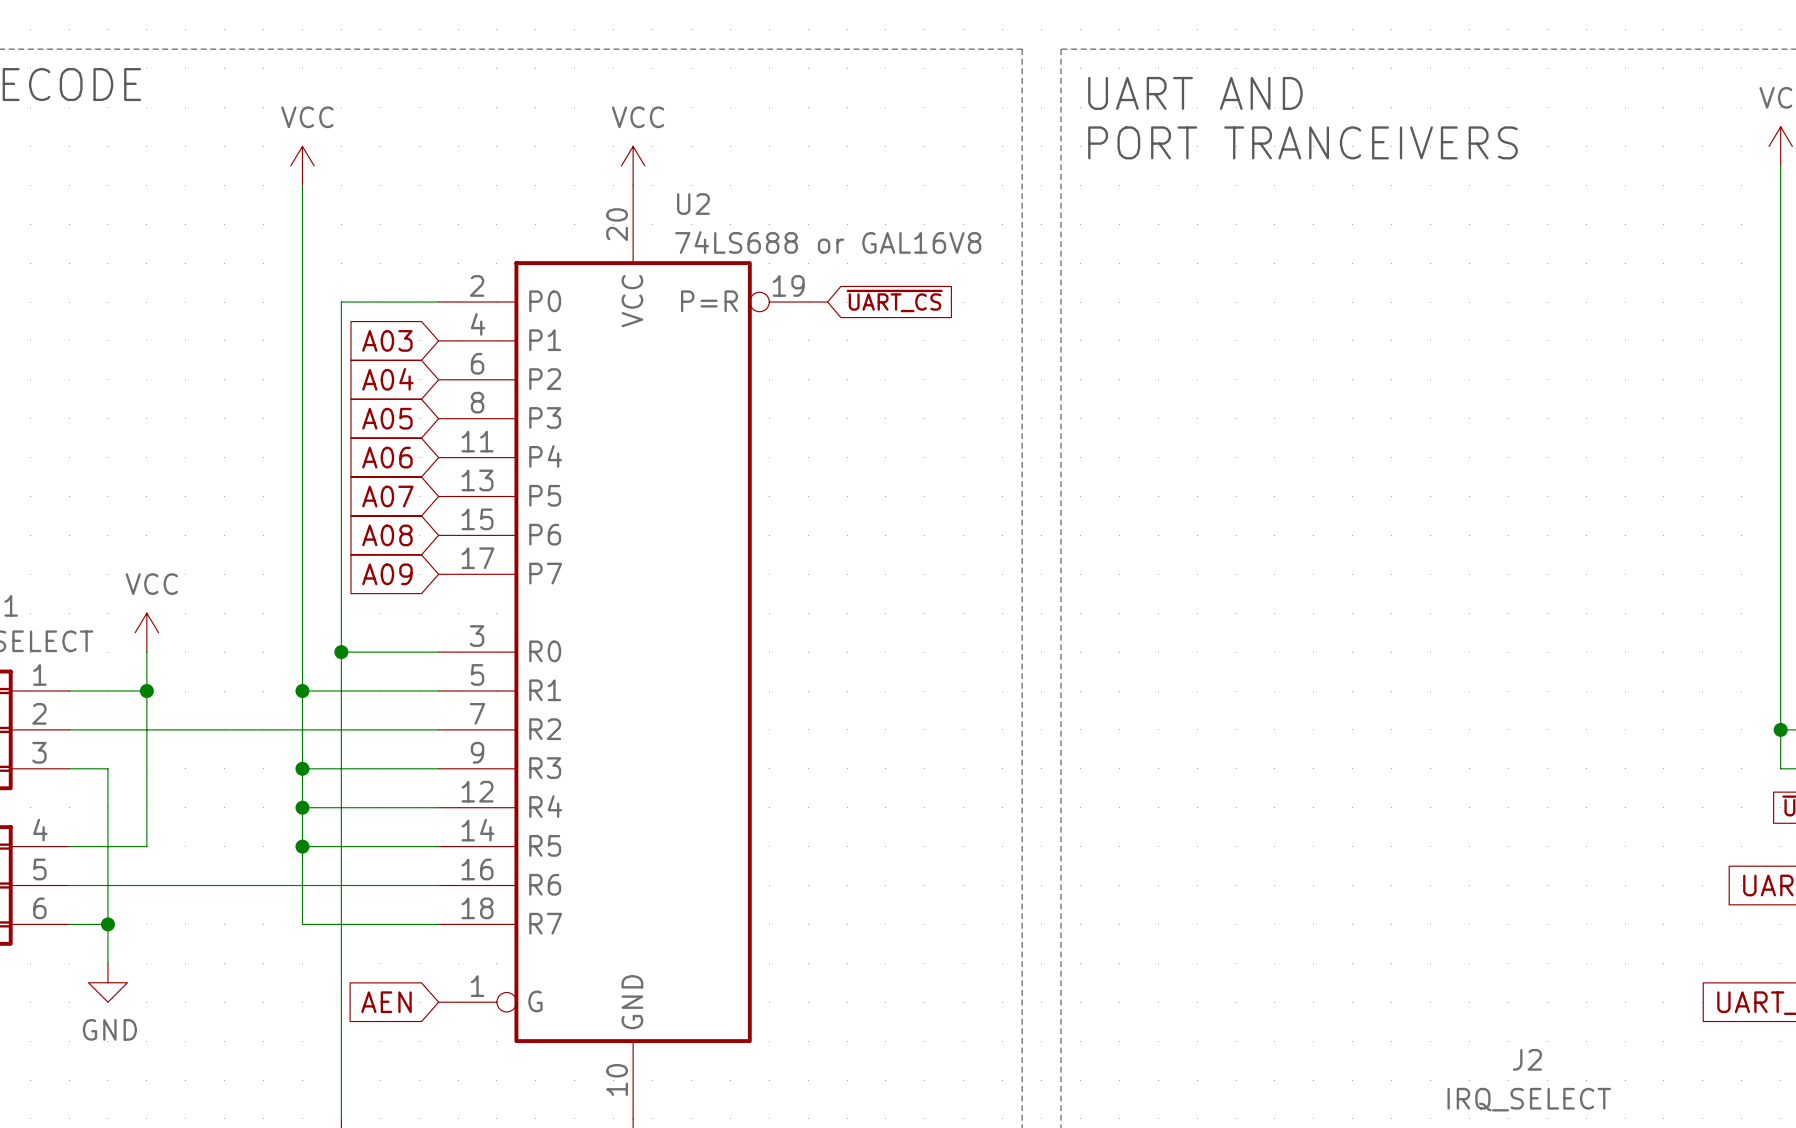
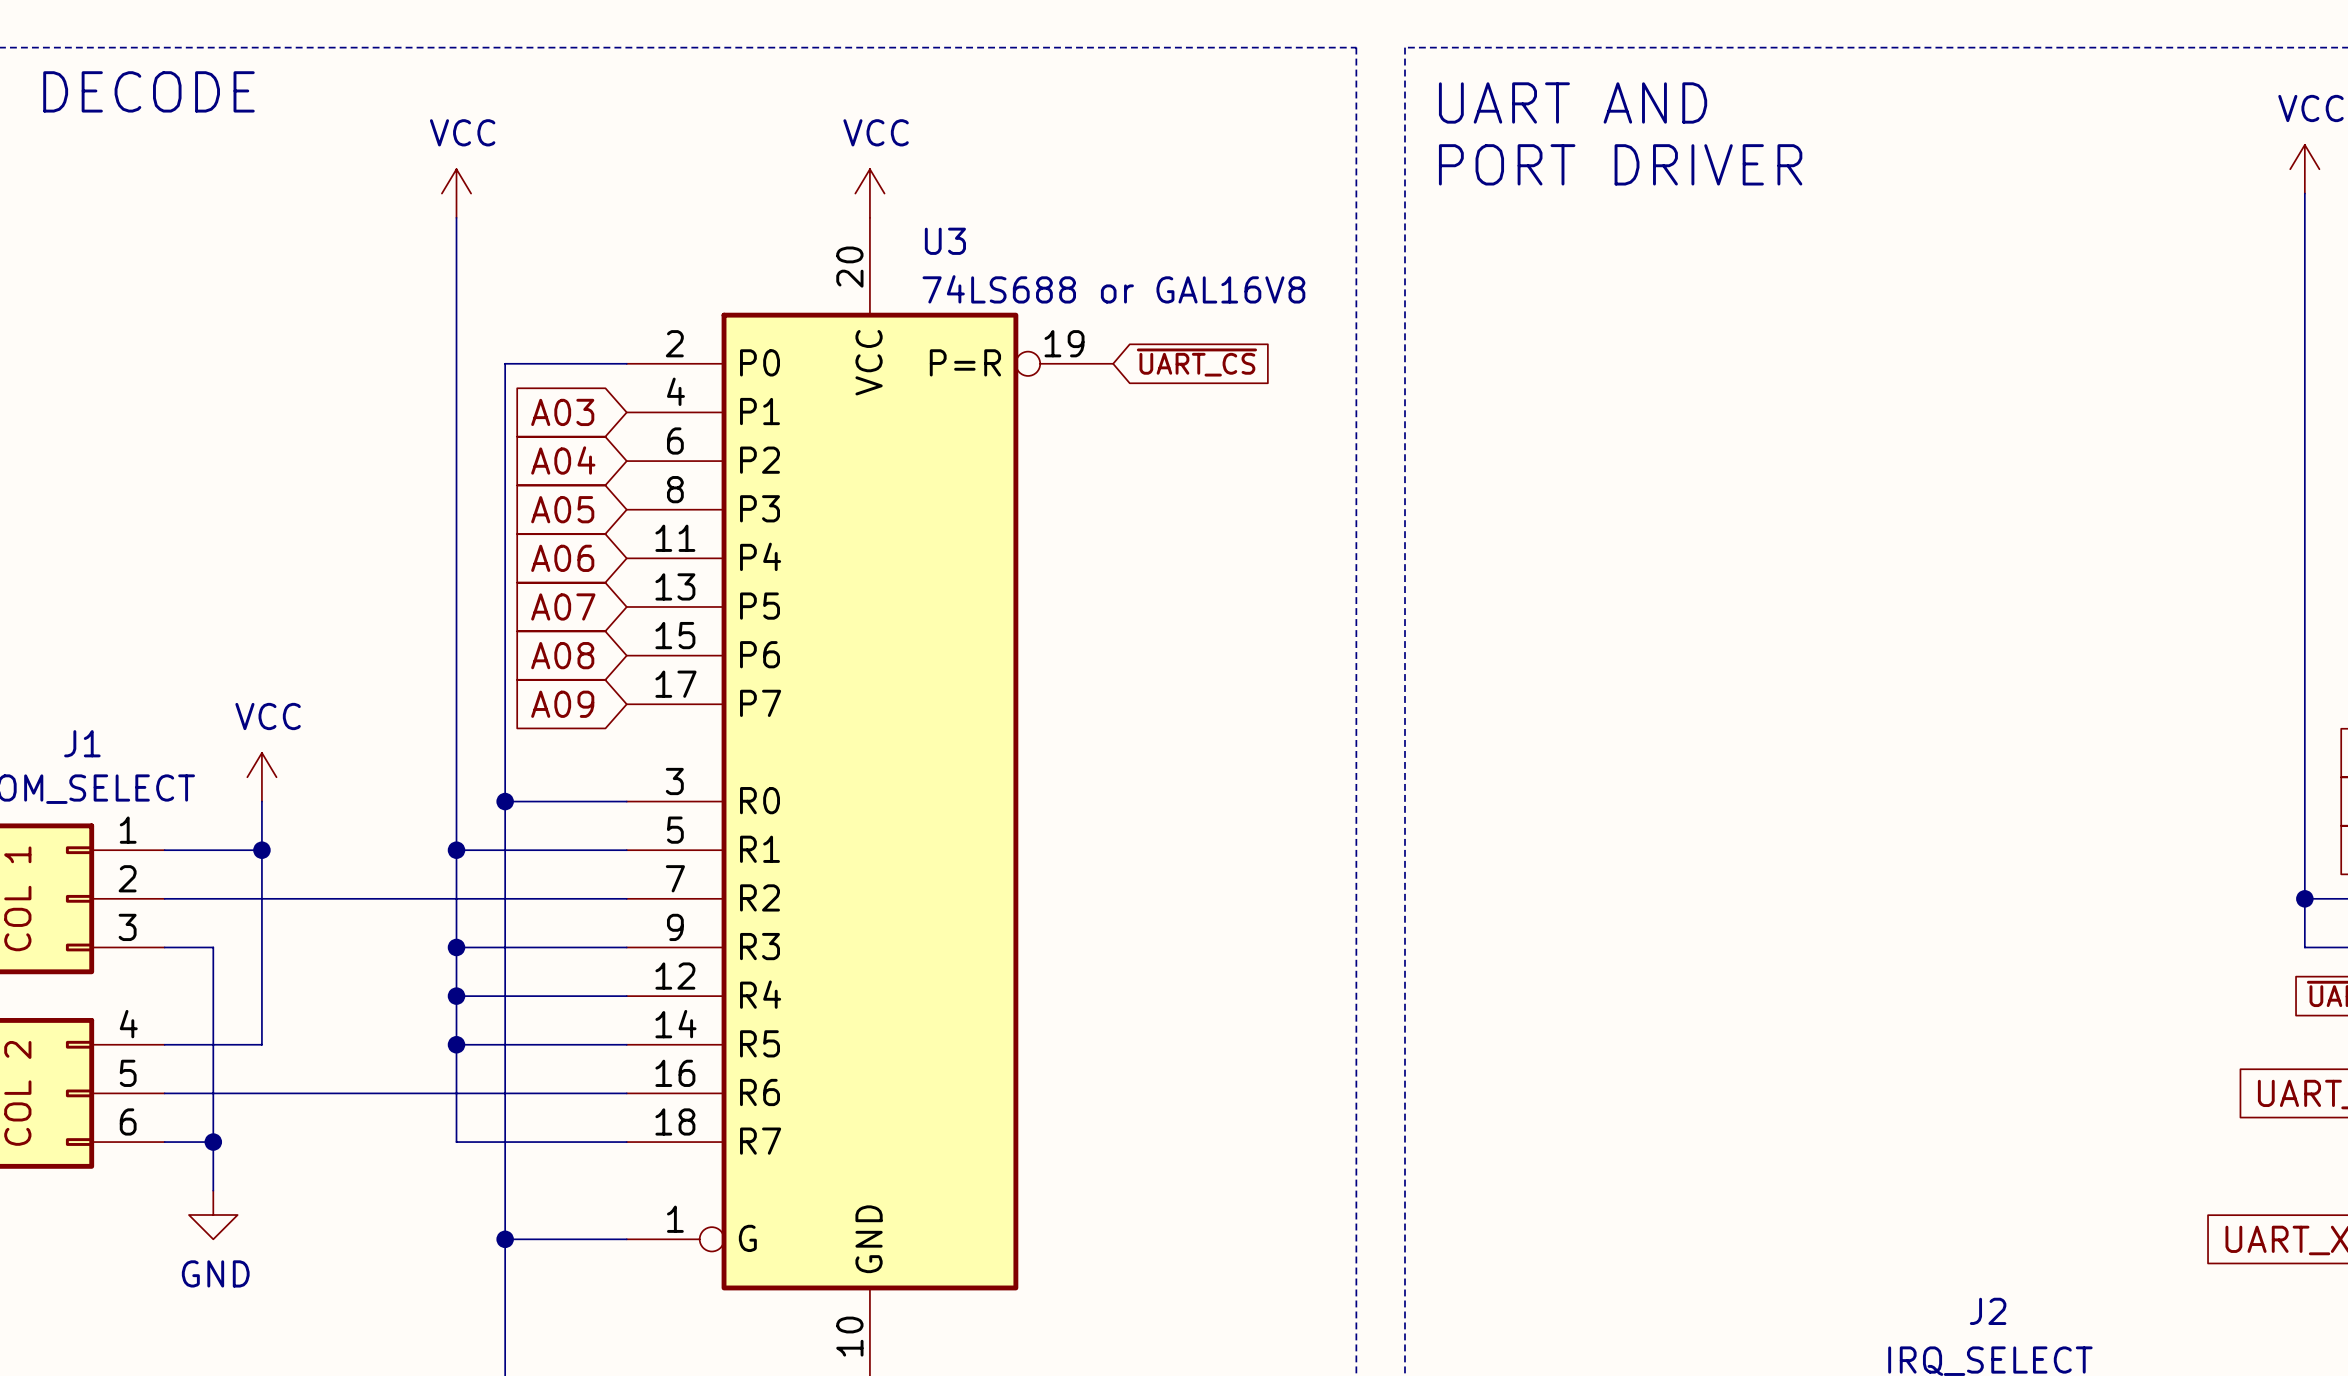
text: PORT TRANCEIVERS (1302, 142) -> PORT DRIVER (1620, 164)
U2 name: U2 (693, 204) -> U3 (945, 241)
wire: none -> (505, 1239) (626, 1239)
junction: none -> (505, 1239)
global label: AEN (386, 1002) -> none

